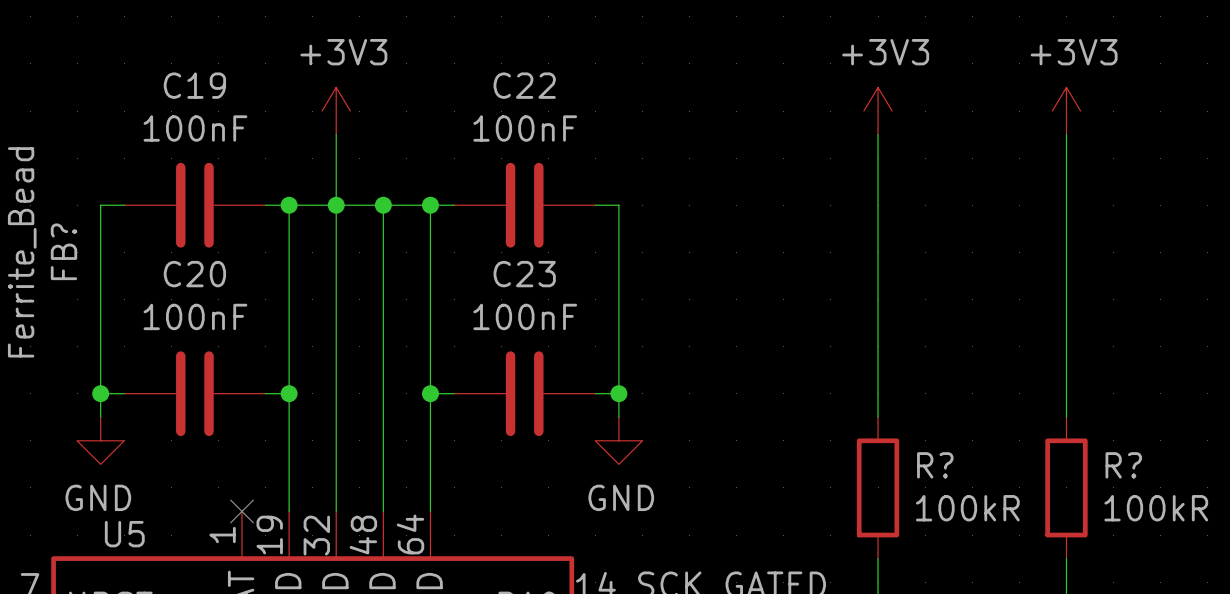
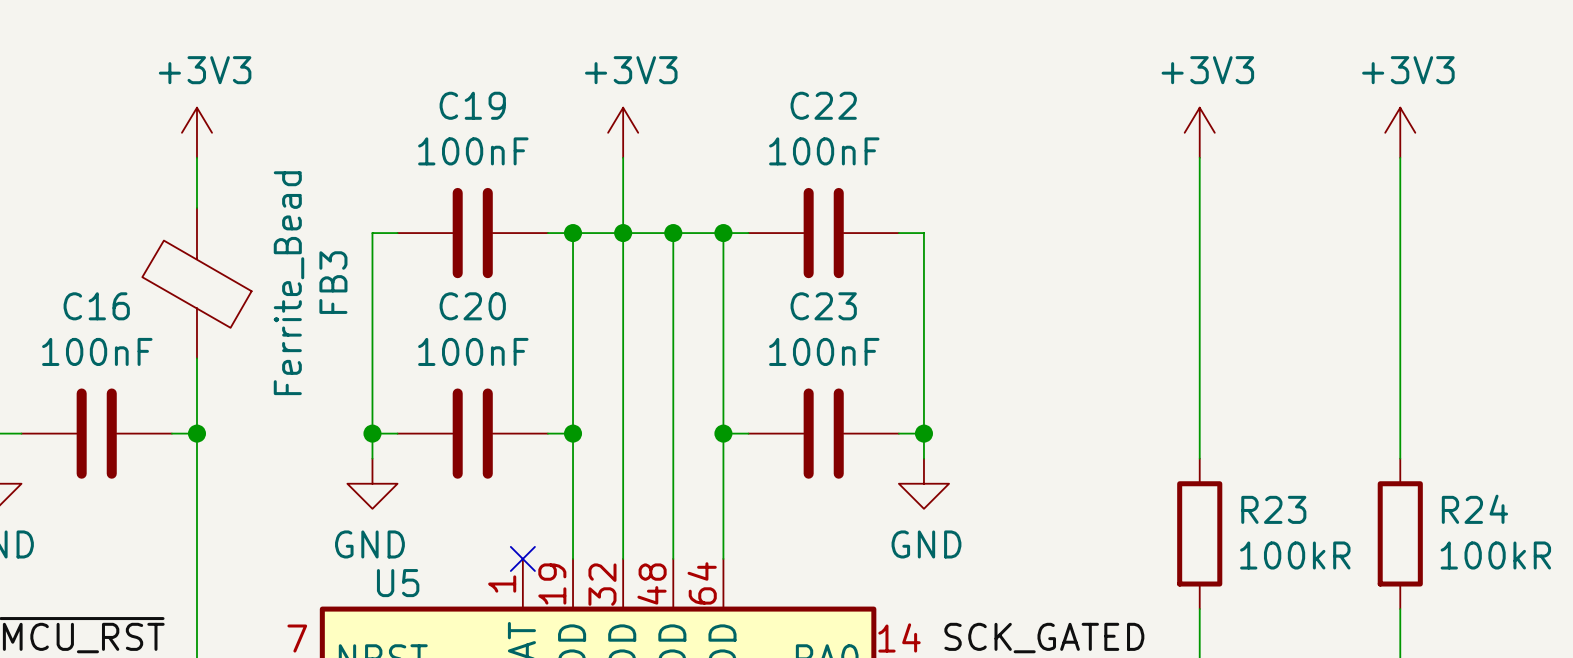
FB? name: FB? (63, 251) -> FB3 (333, 282)
R? name: R? (935, 465) -> R23 (1273, 509)
R? name: R? (1123, 465) -> R24 (1474, 509)

